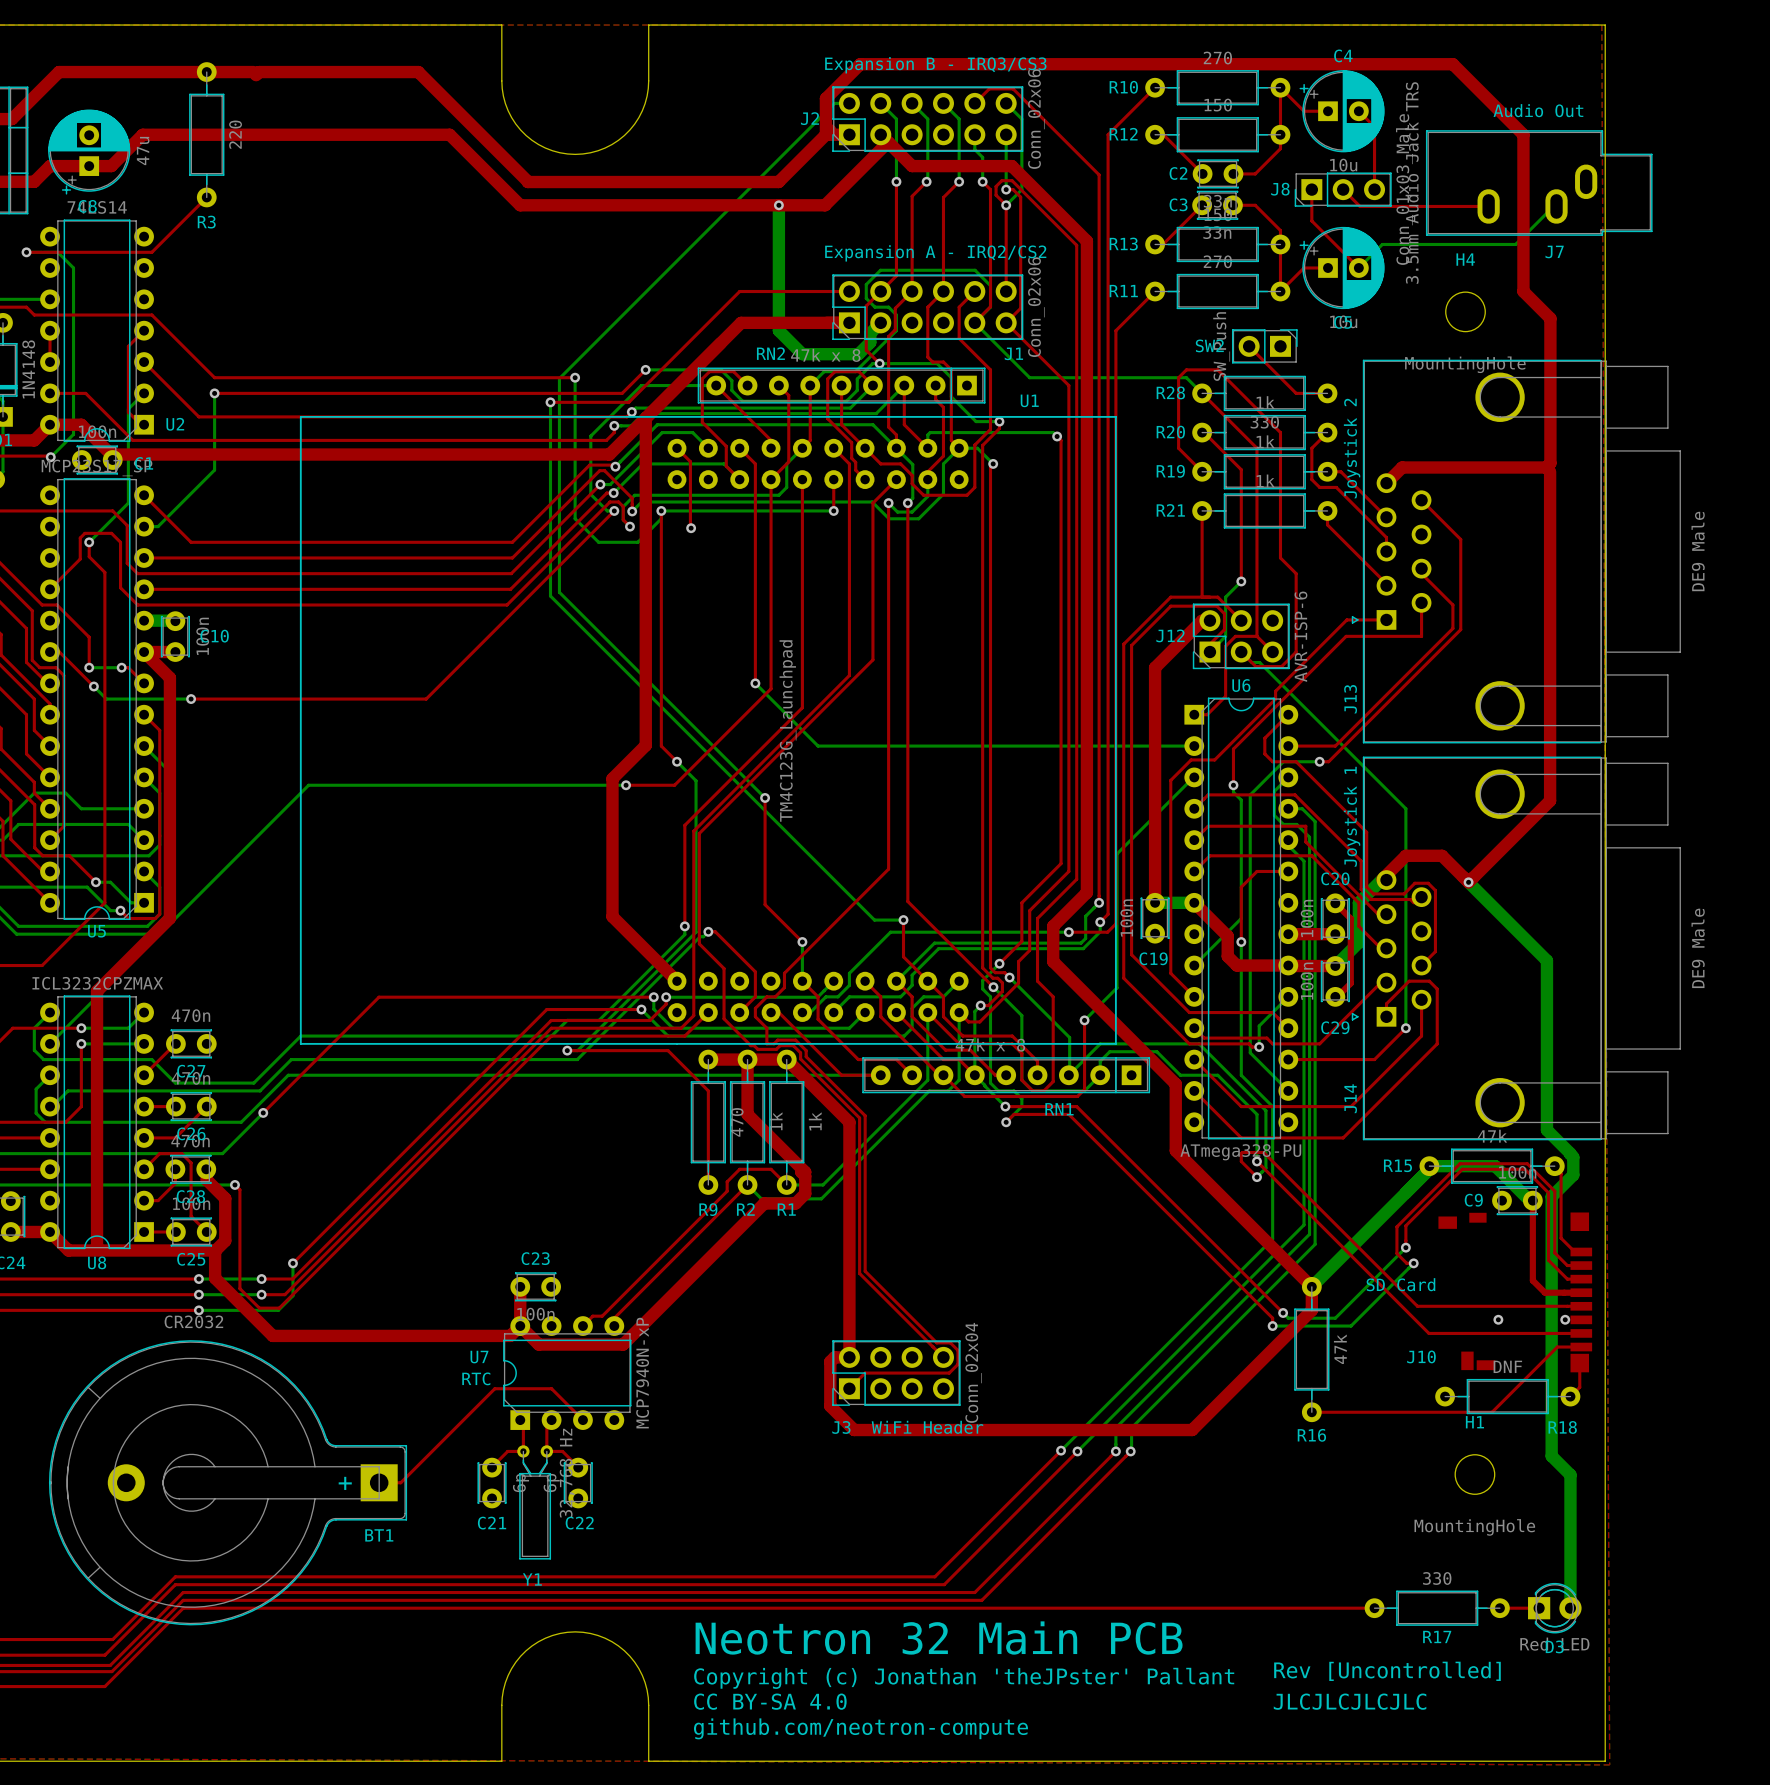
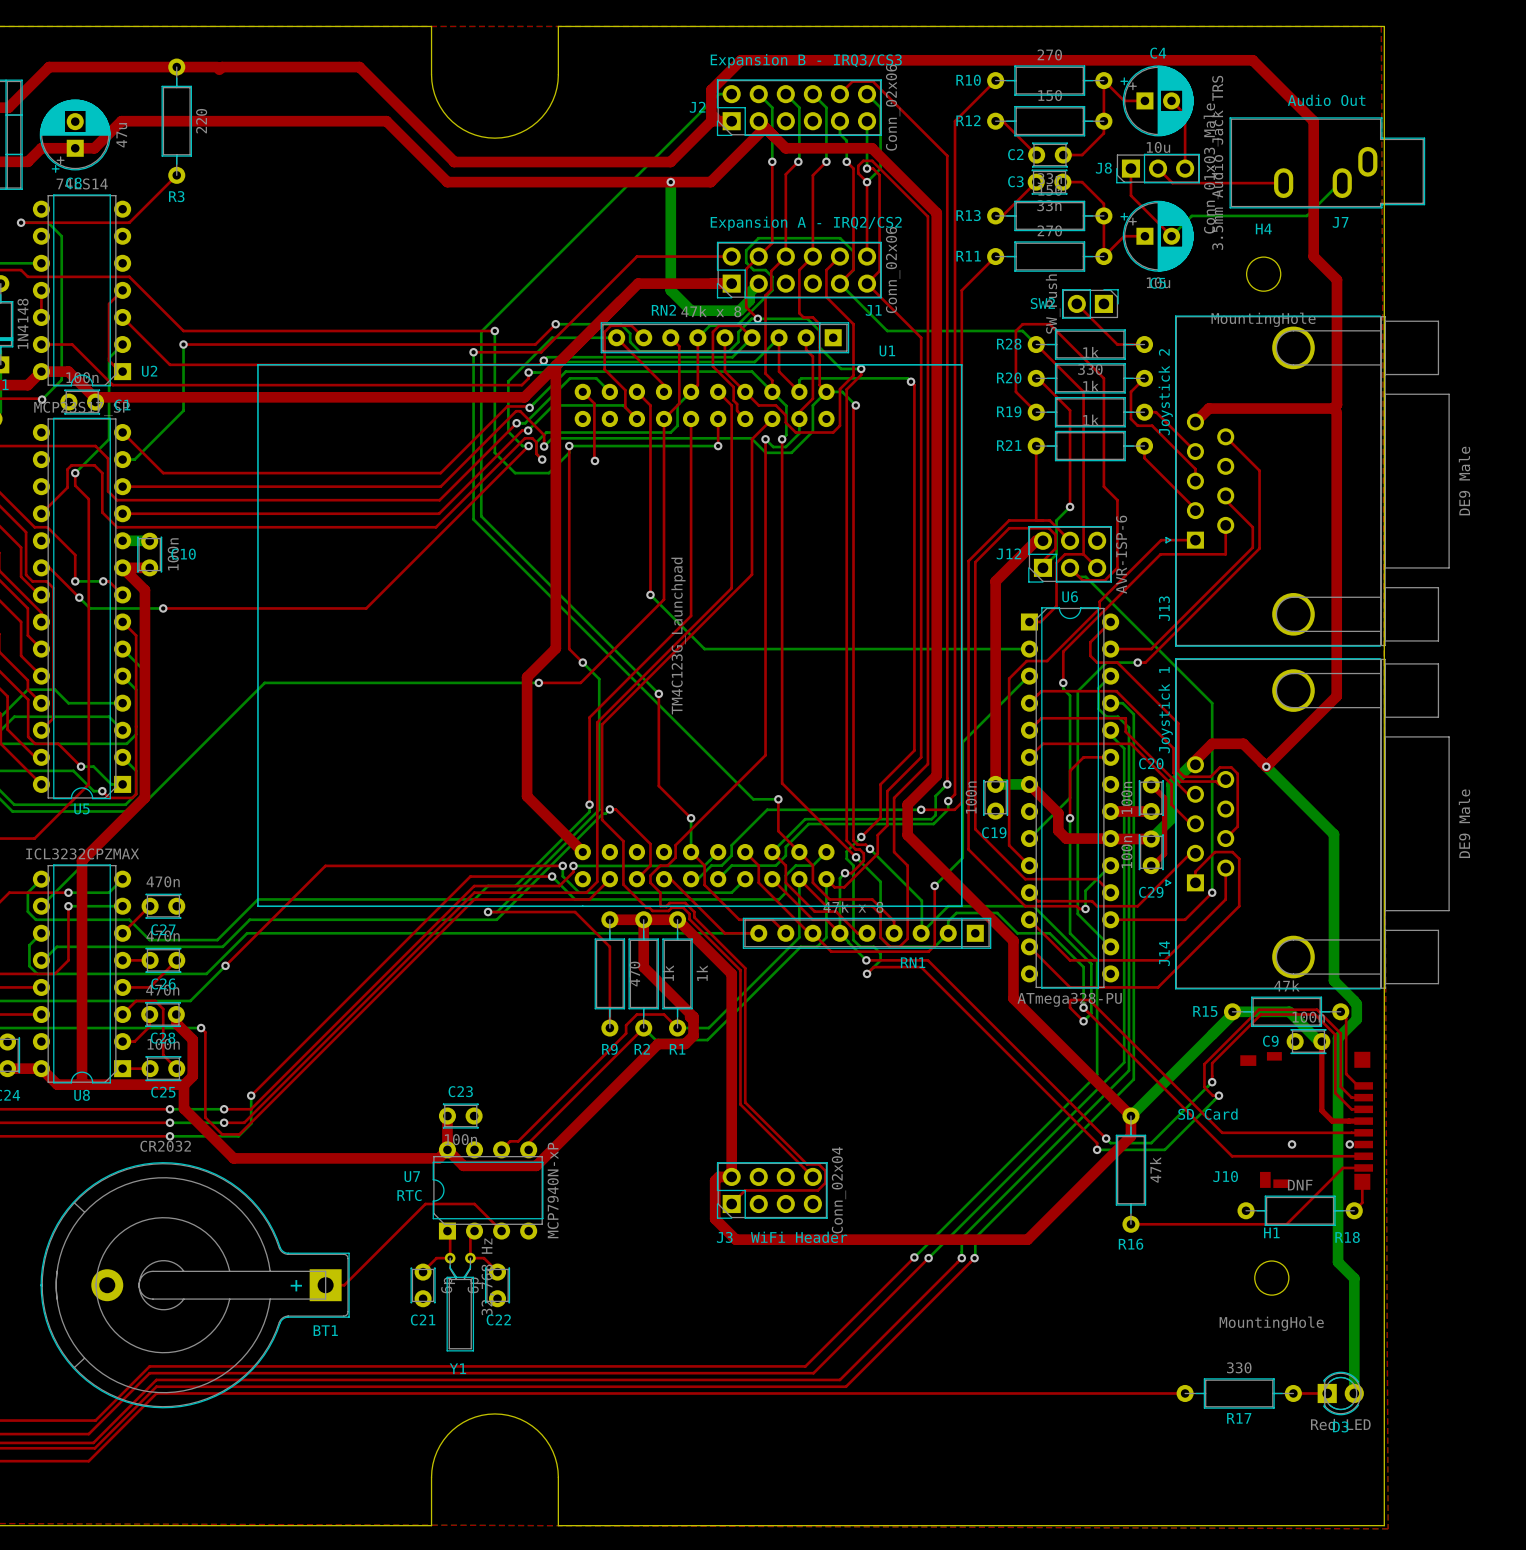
text: Neotron 32 Main PCB (939, 1638) -> none
text: Rev [Uncontrolled] (1387, 1671) -> none
text: Copyright (c) Jonathan 'theJPster' Pallant (964, 1678) -> none
text: CC BY-SA 4.0 (770, 1701) -> none
text: JLCJLCJLCJLC (1350, 1701) -> none
text: github.com/neotron-compute (860, 1728) -> none

